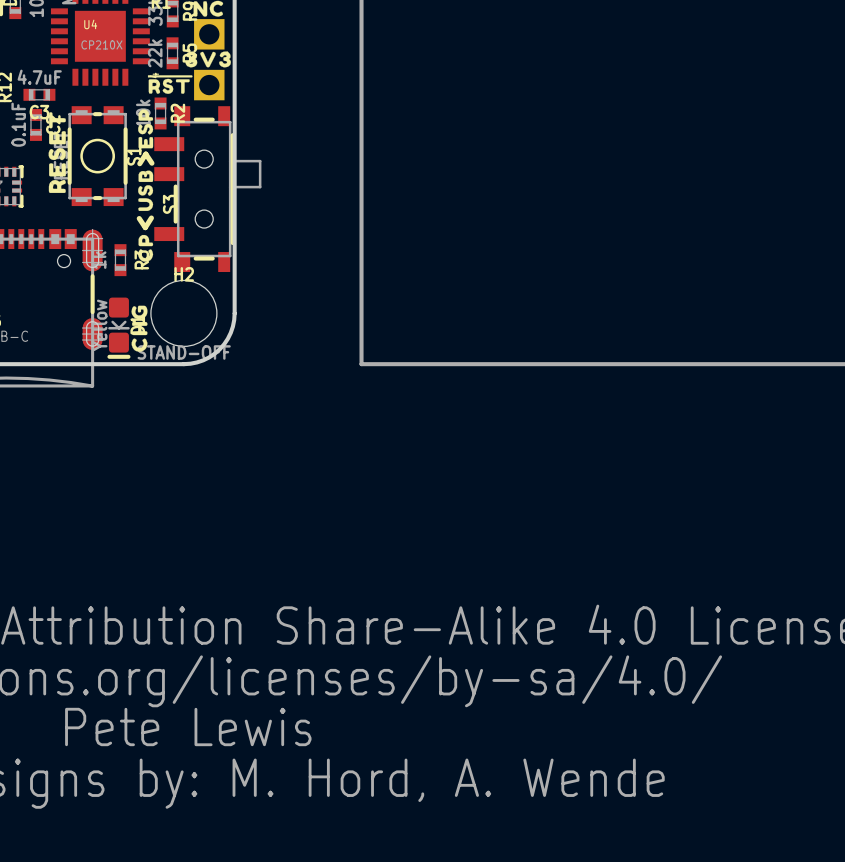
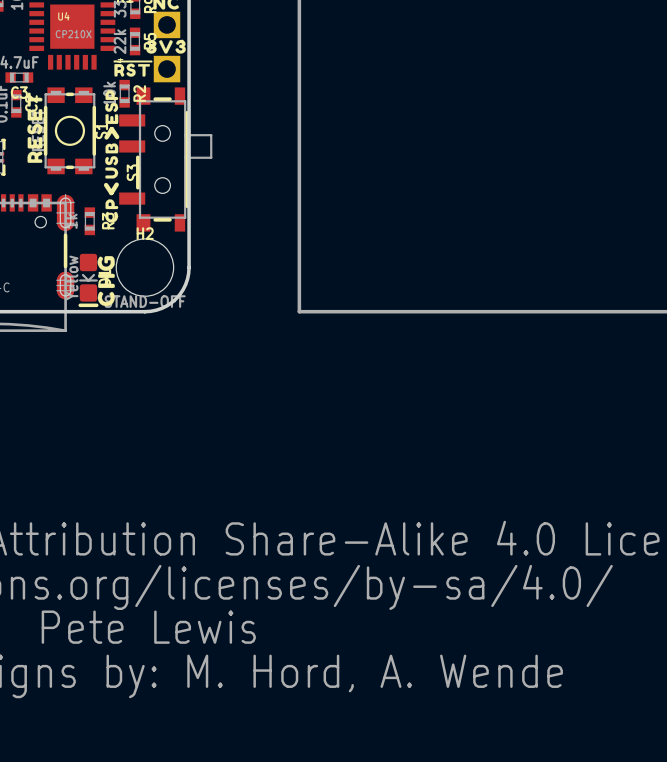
drawing shape: [131, 305, 148, 352] -> [97, 256, 115, 307]

